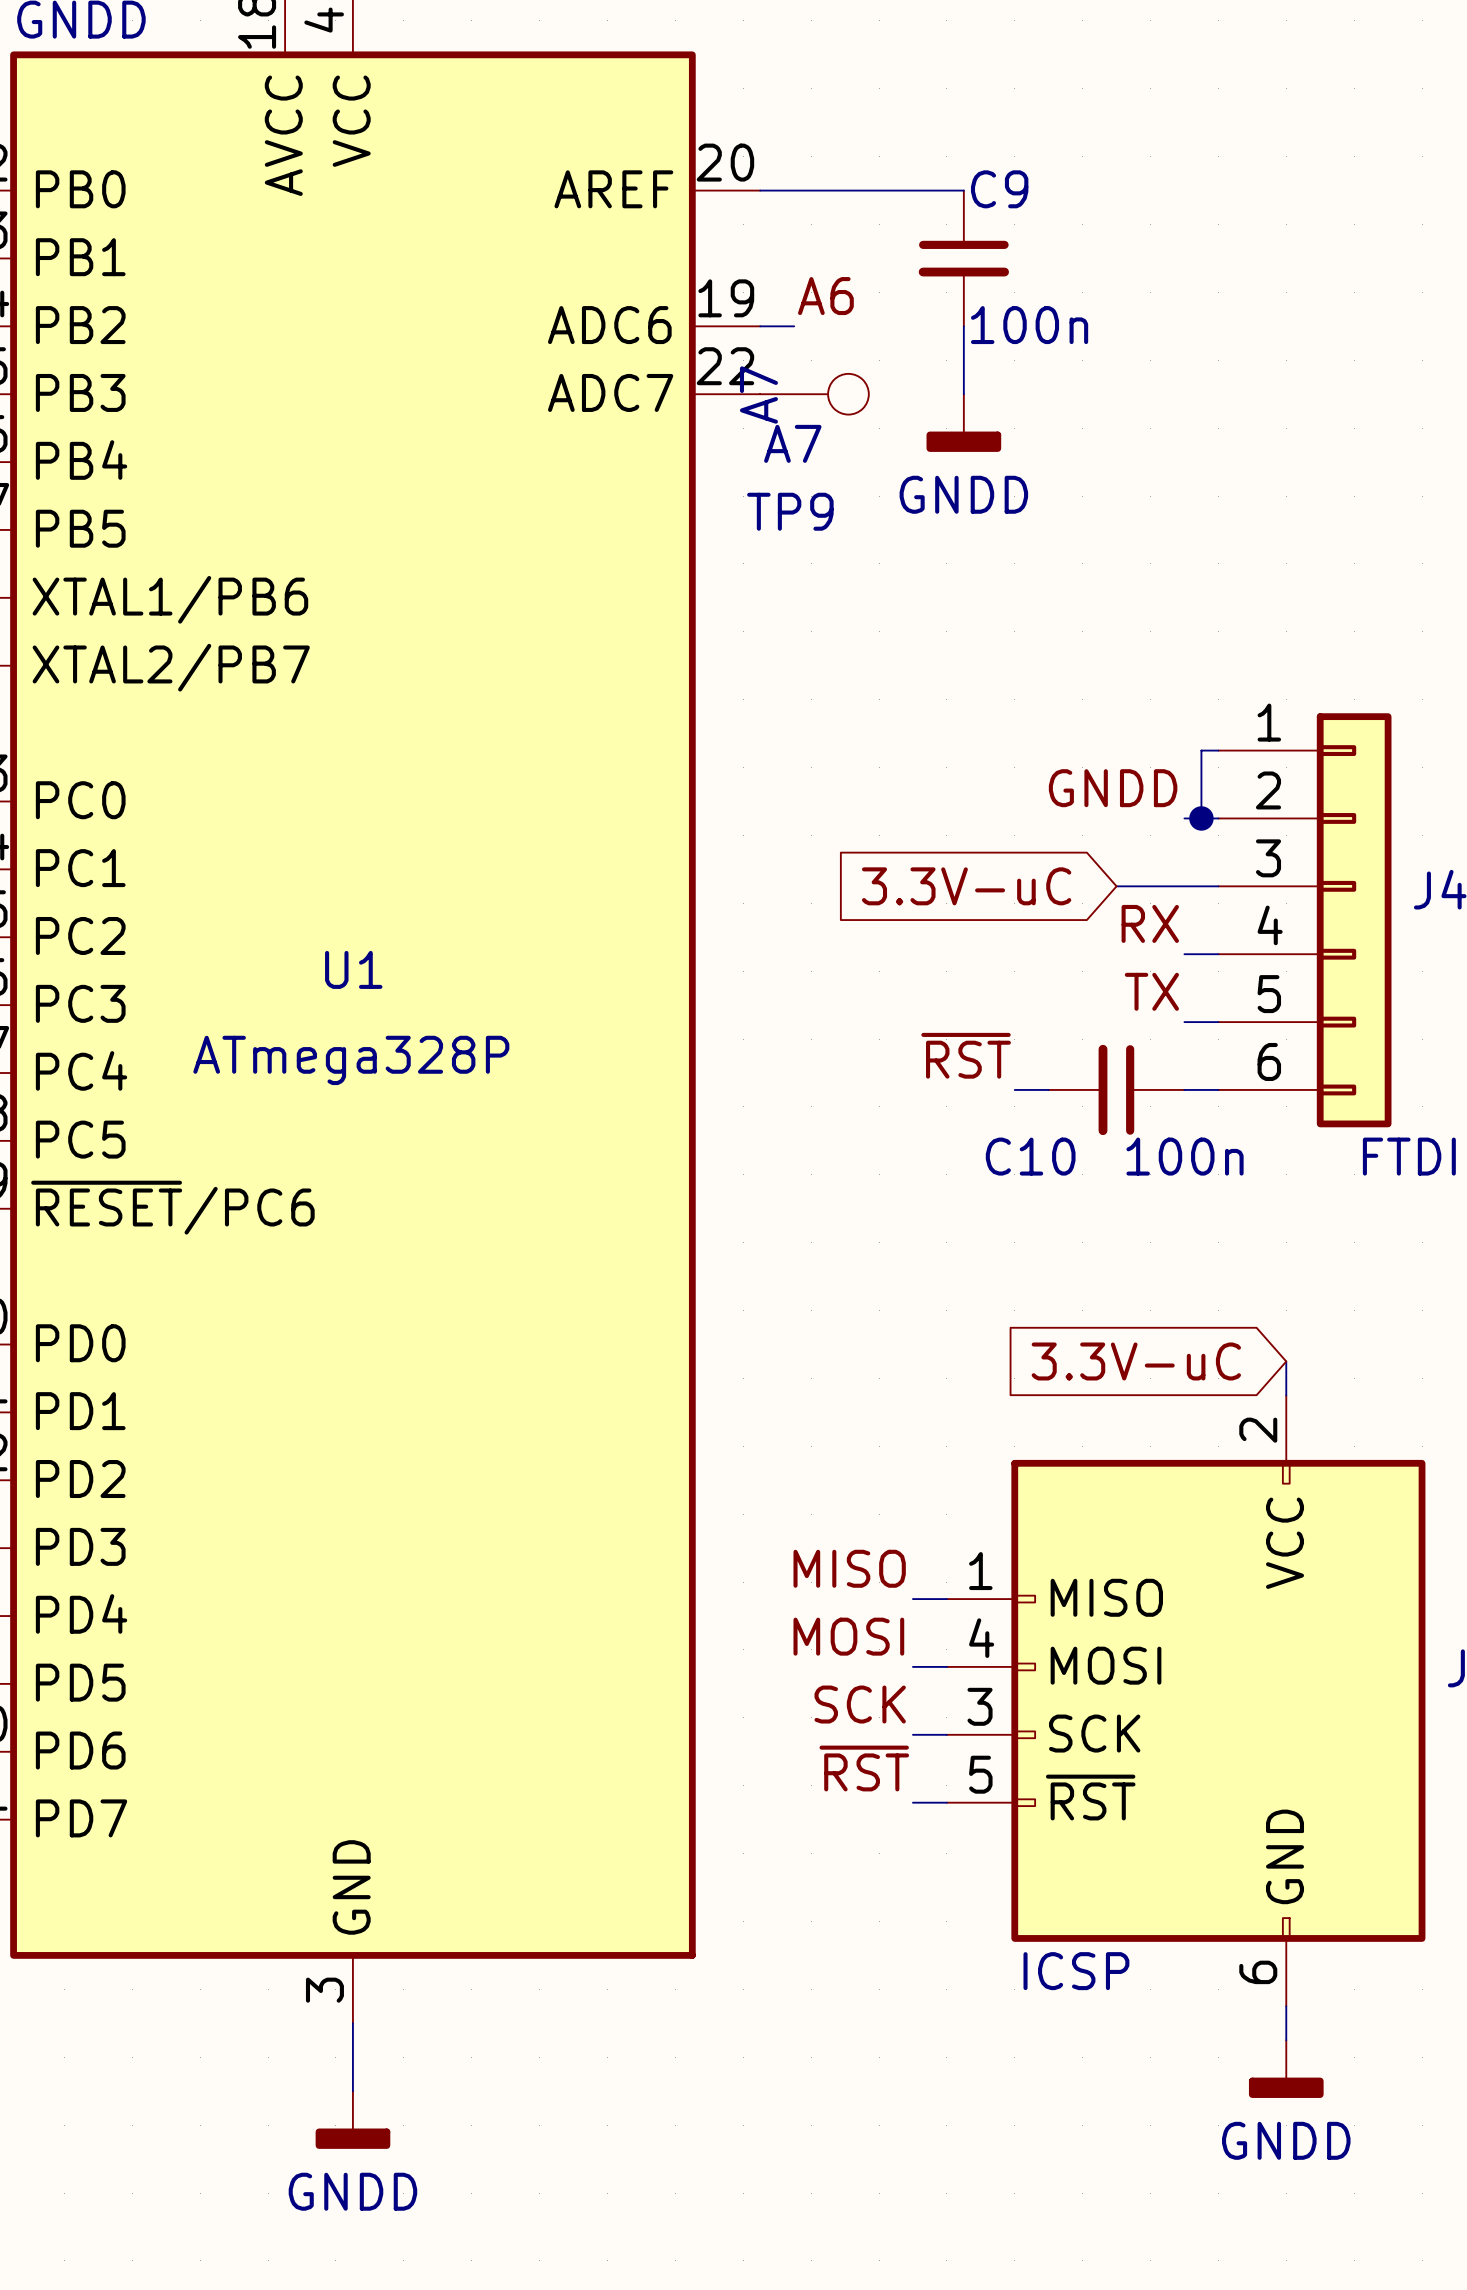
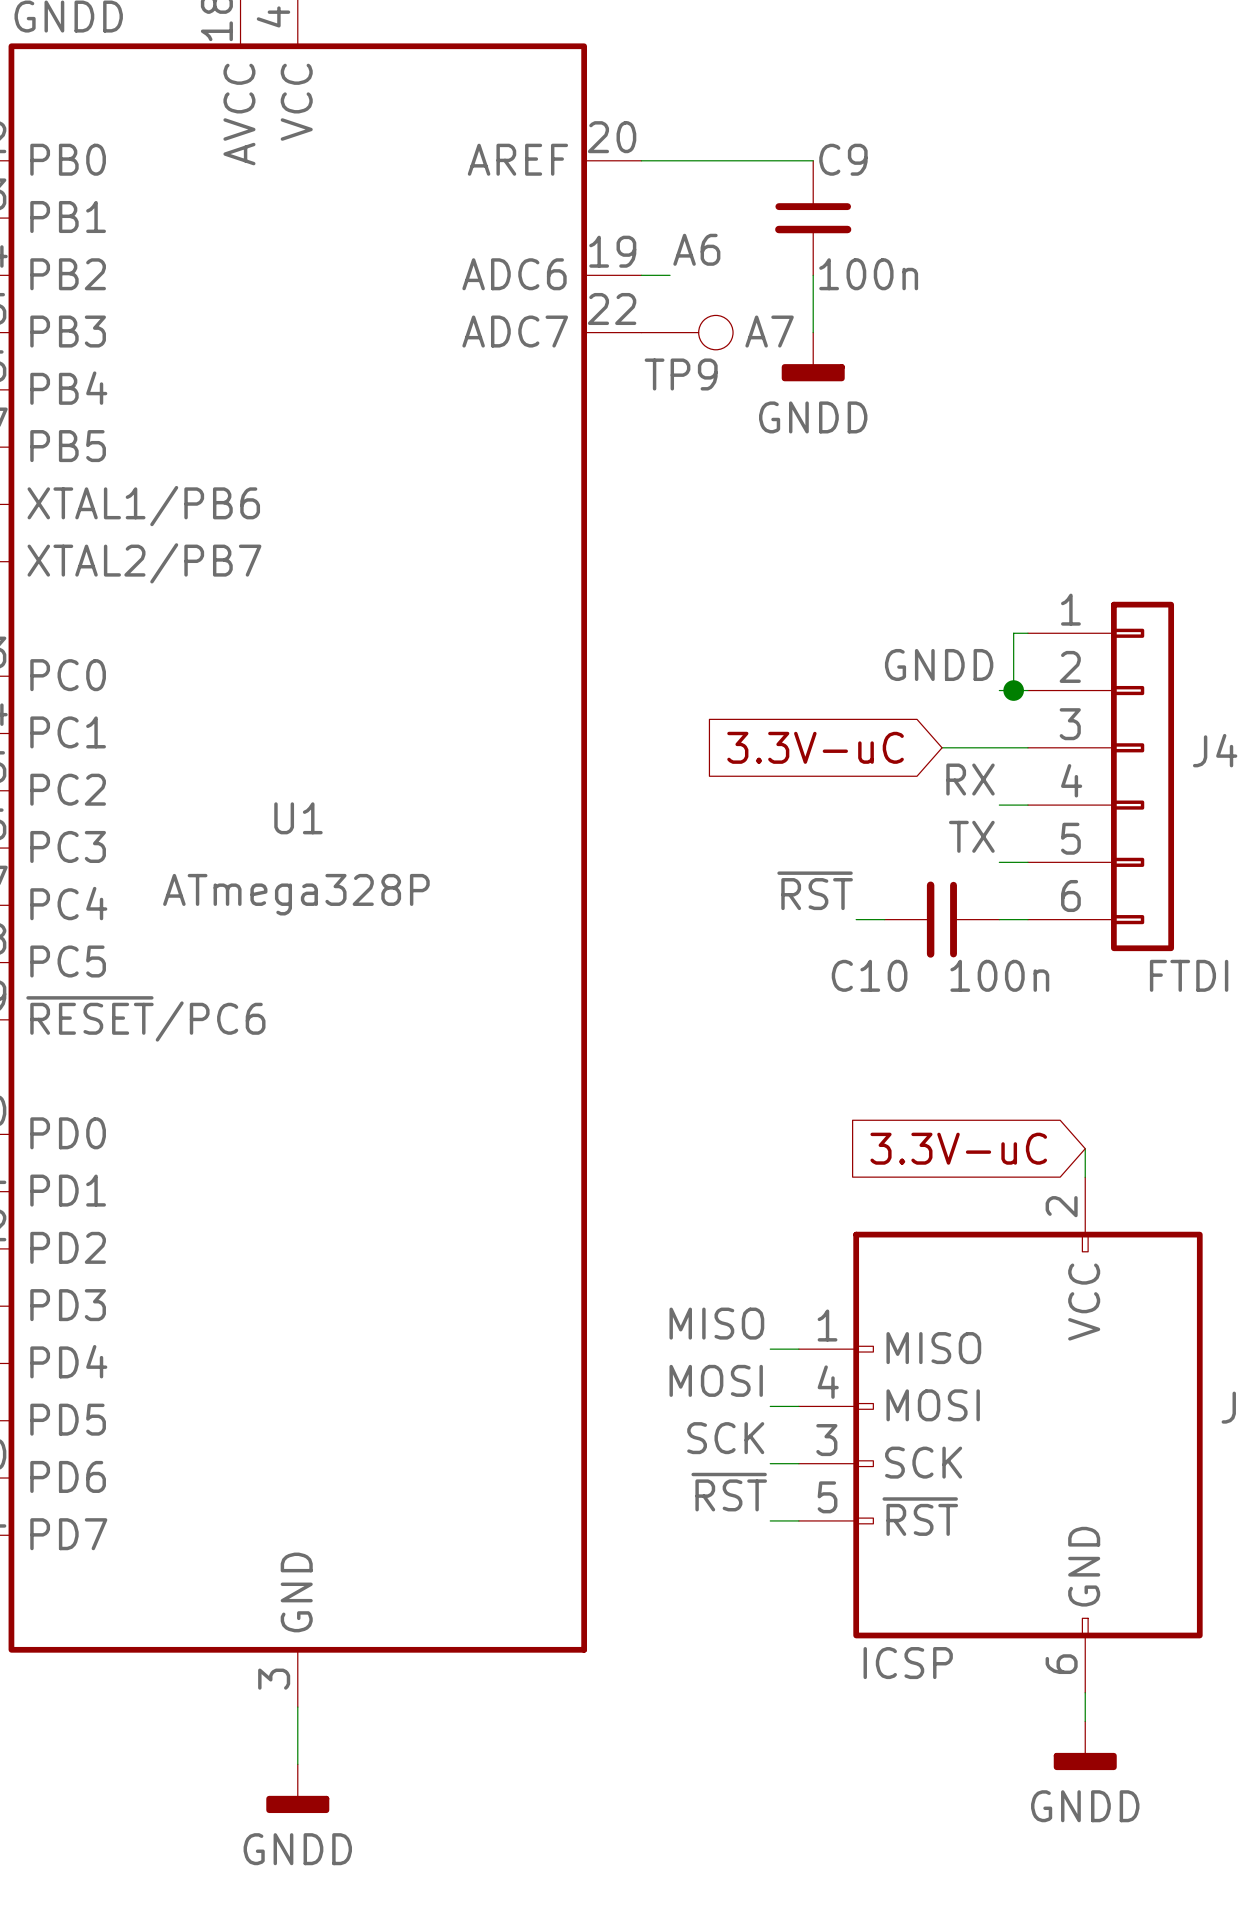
TP9 text rotation: 0° (758, 395) -> 90° clockwise (769, 331)
TP9 text position: A7 (758, 395) -> A7 (769, 331)
TP9 value: A7 (792, 443) -> none
TP9 name position: TP9 (790, 511) -> TP9 (681, 374)

